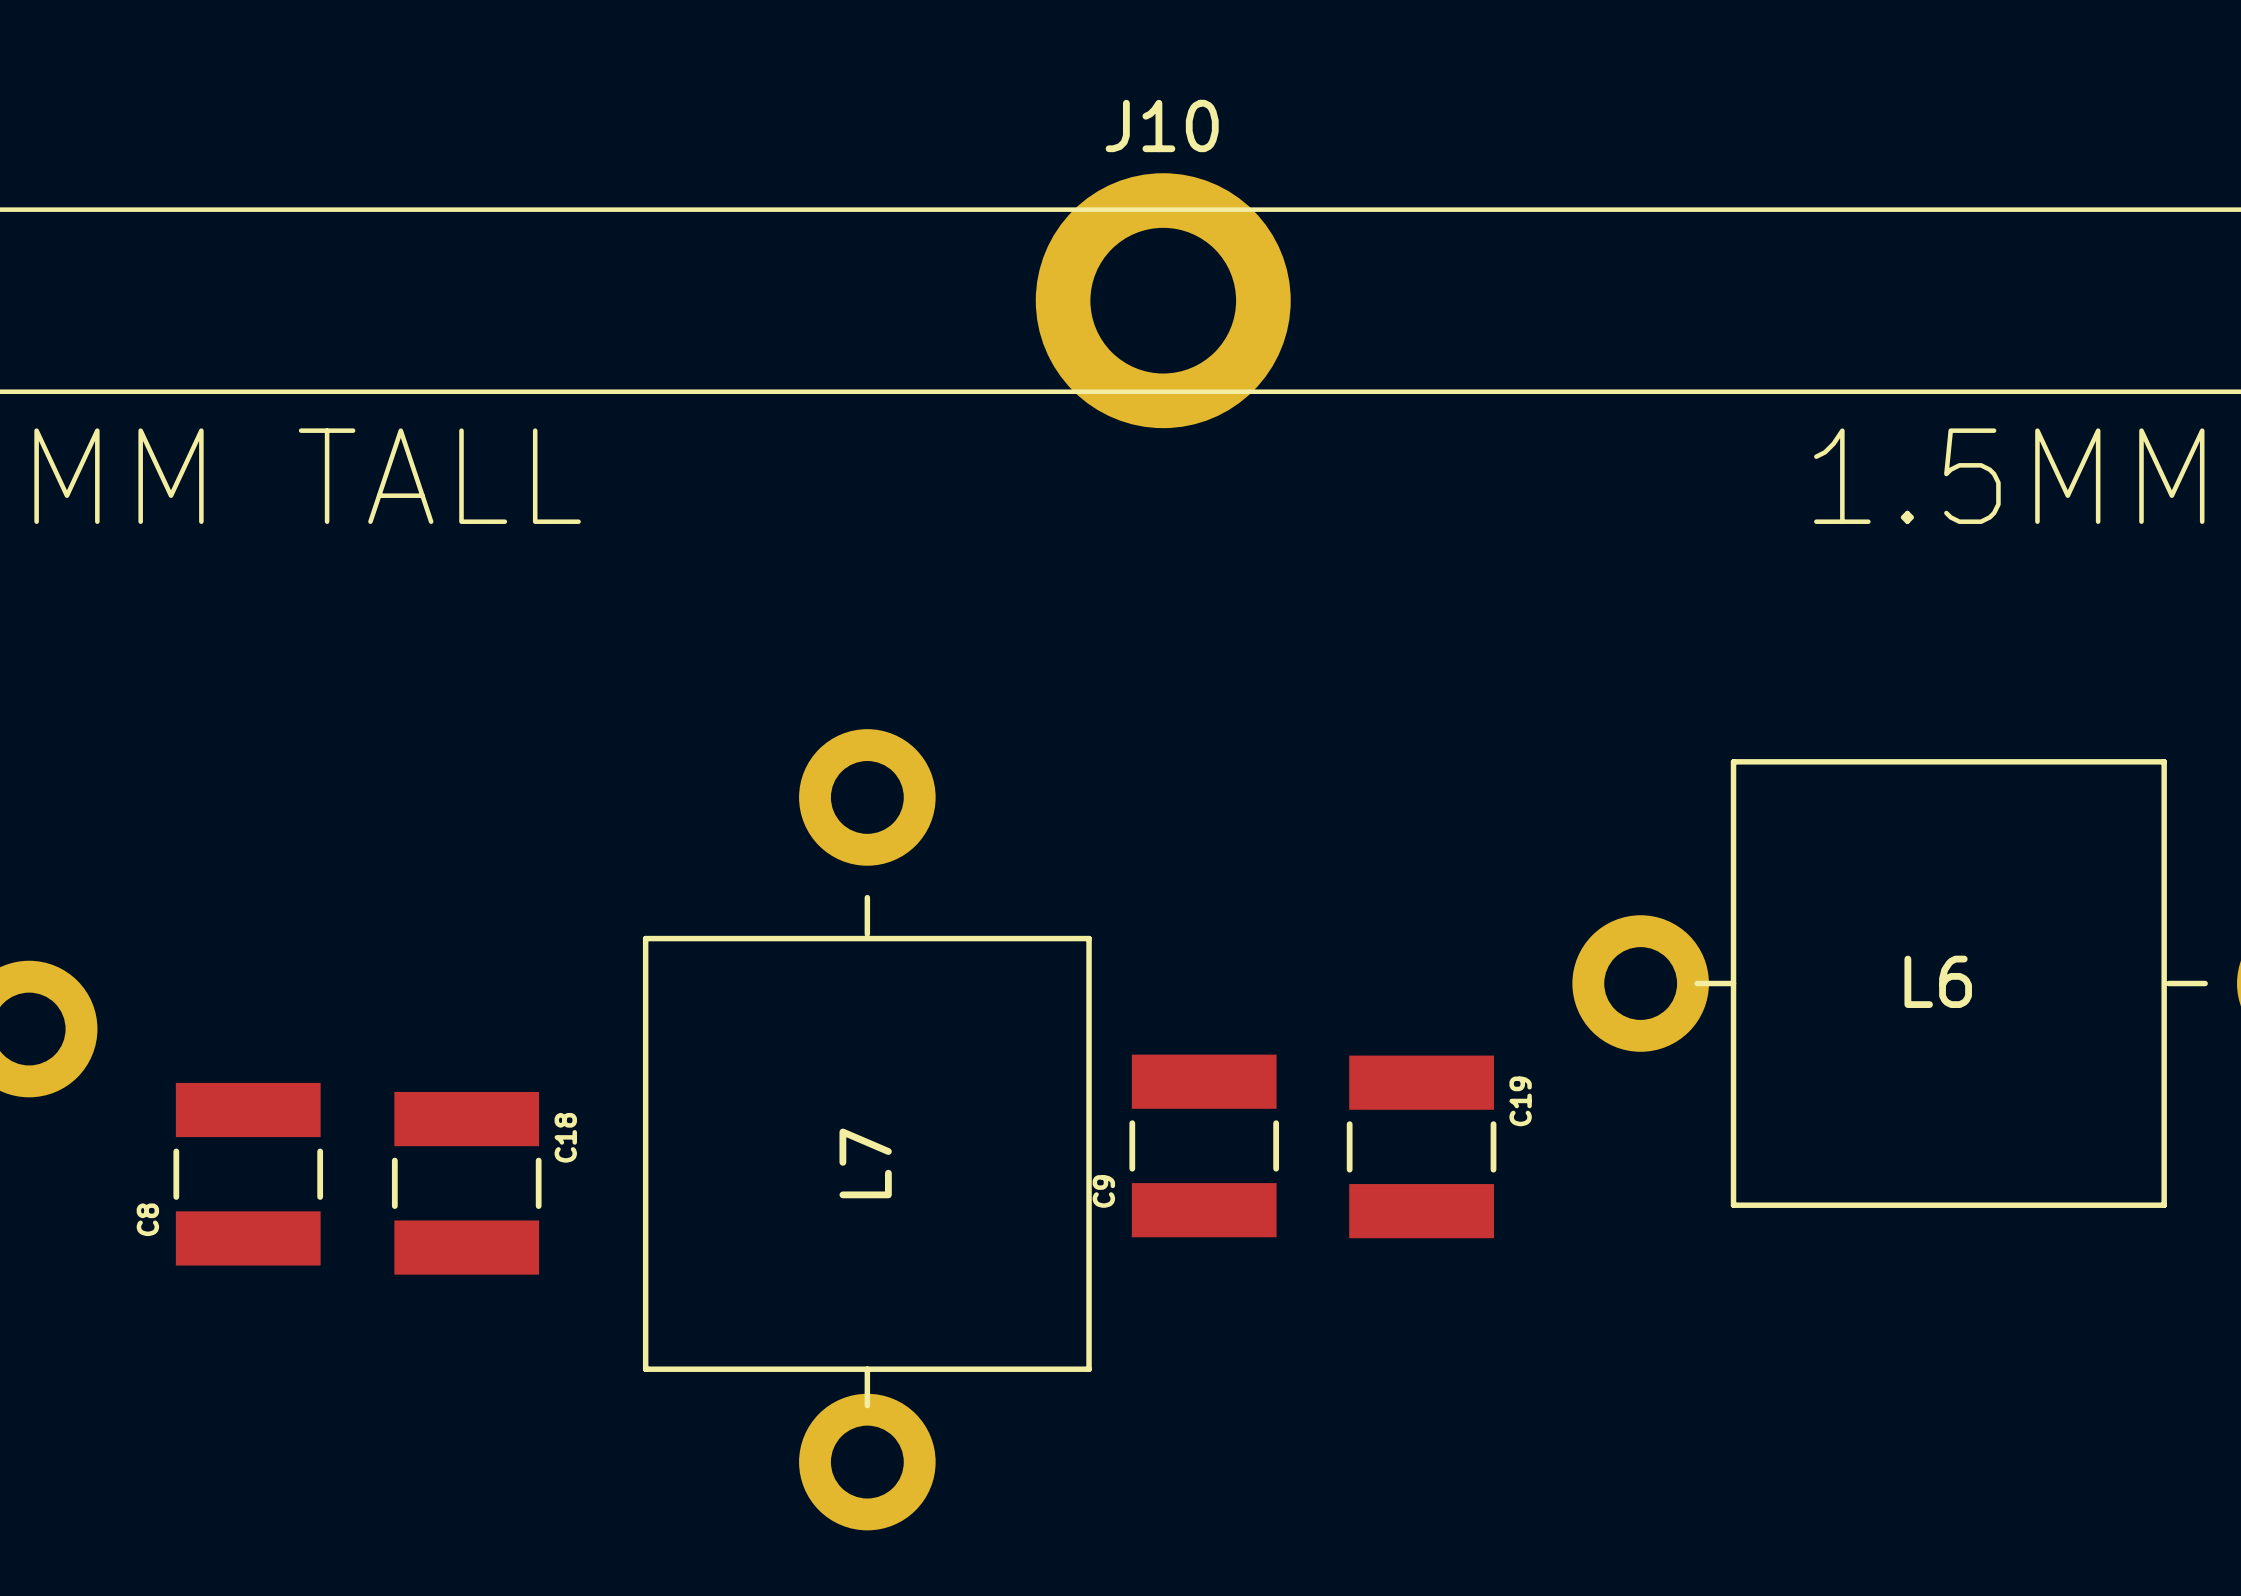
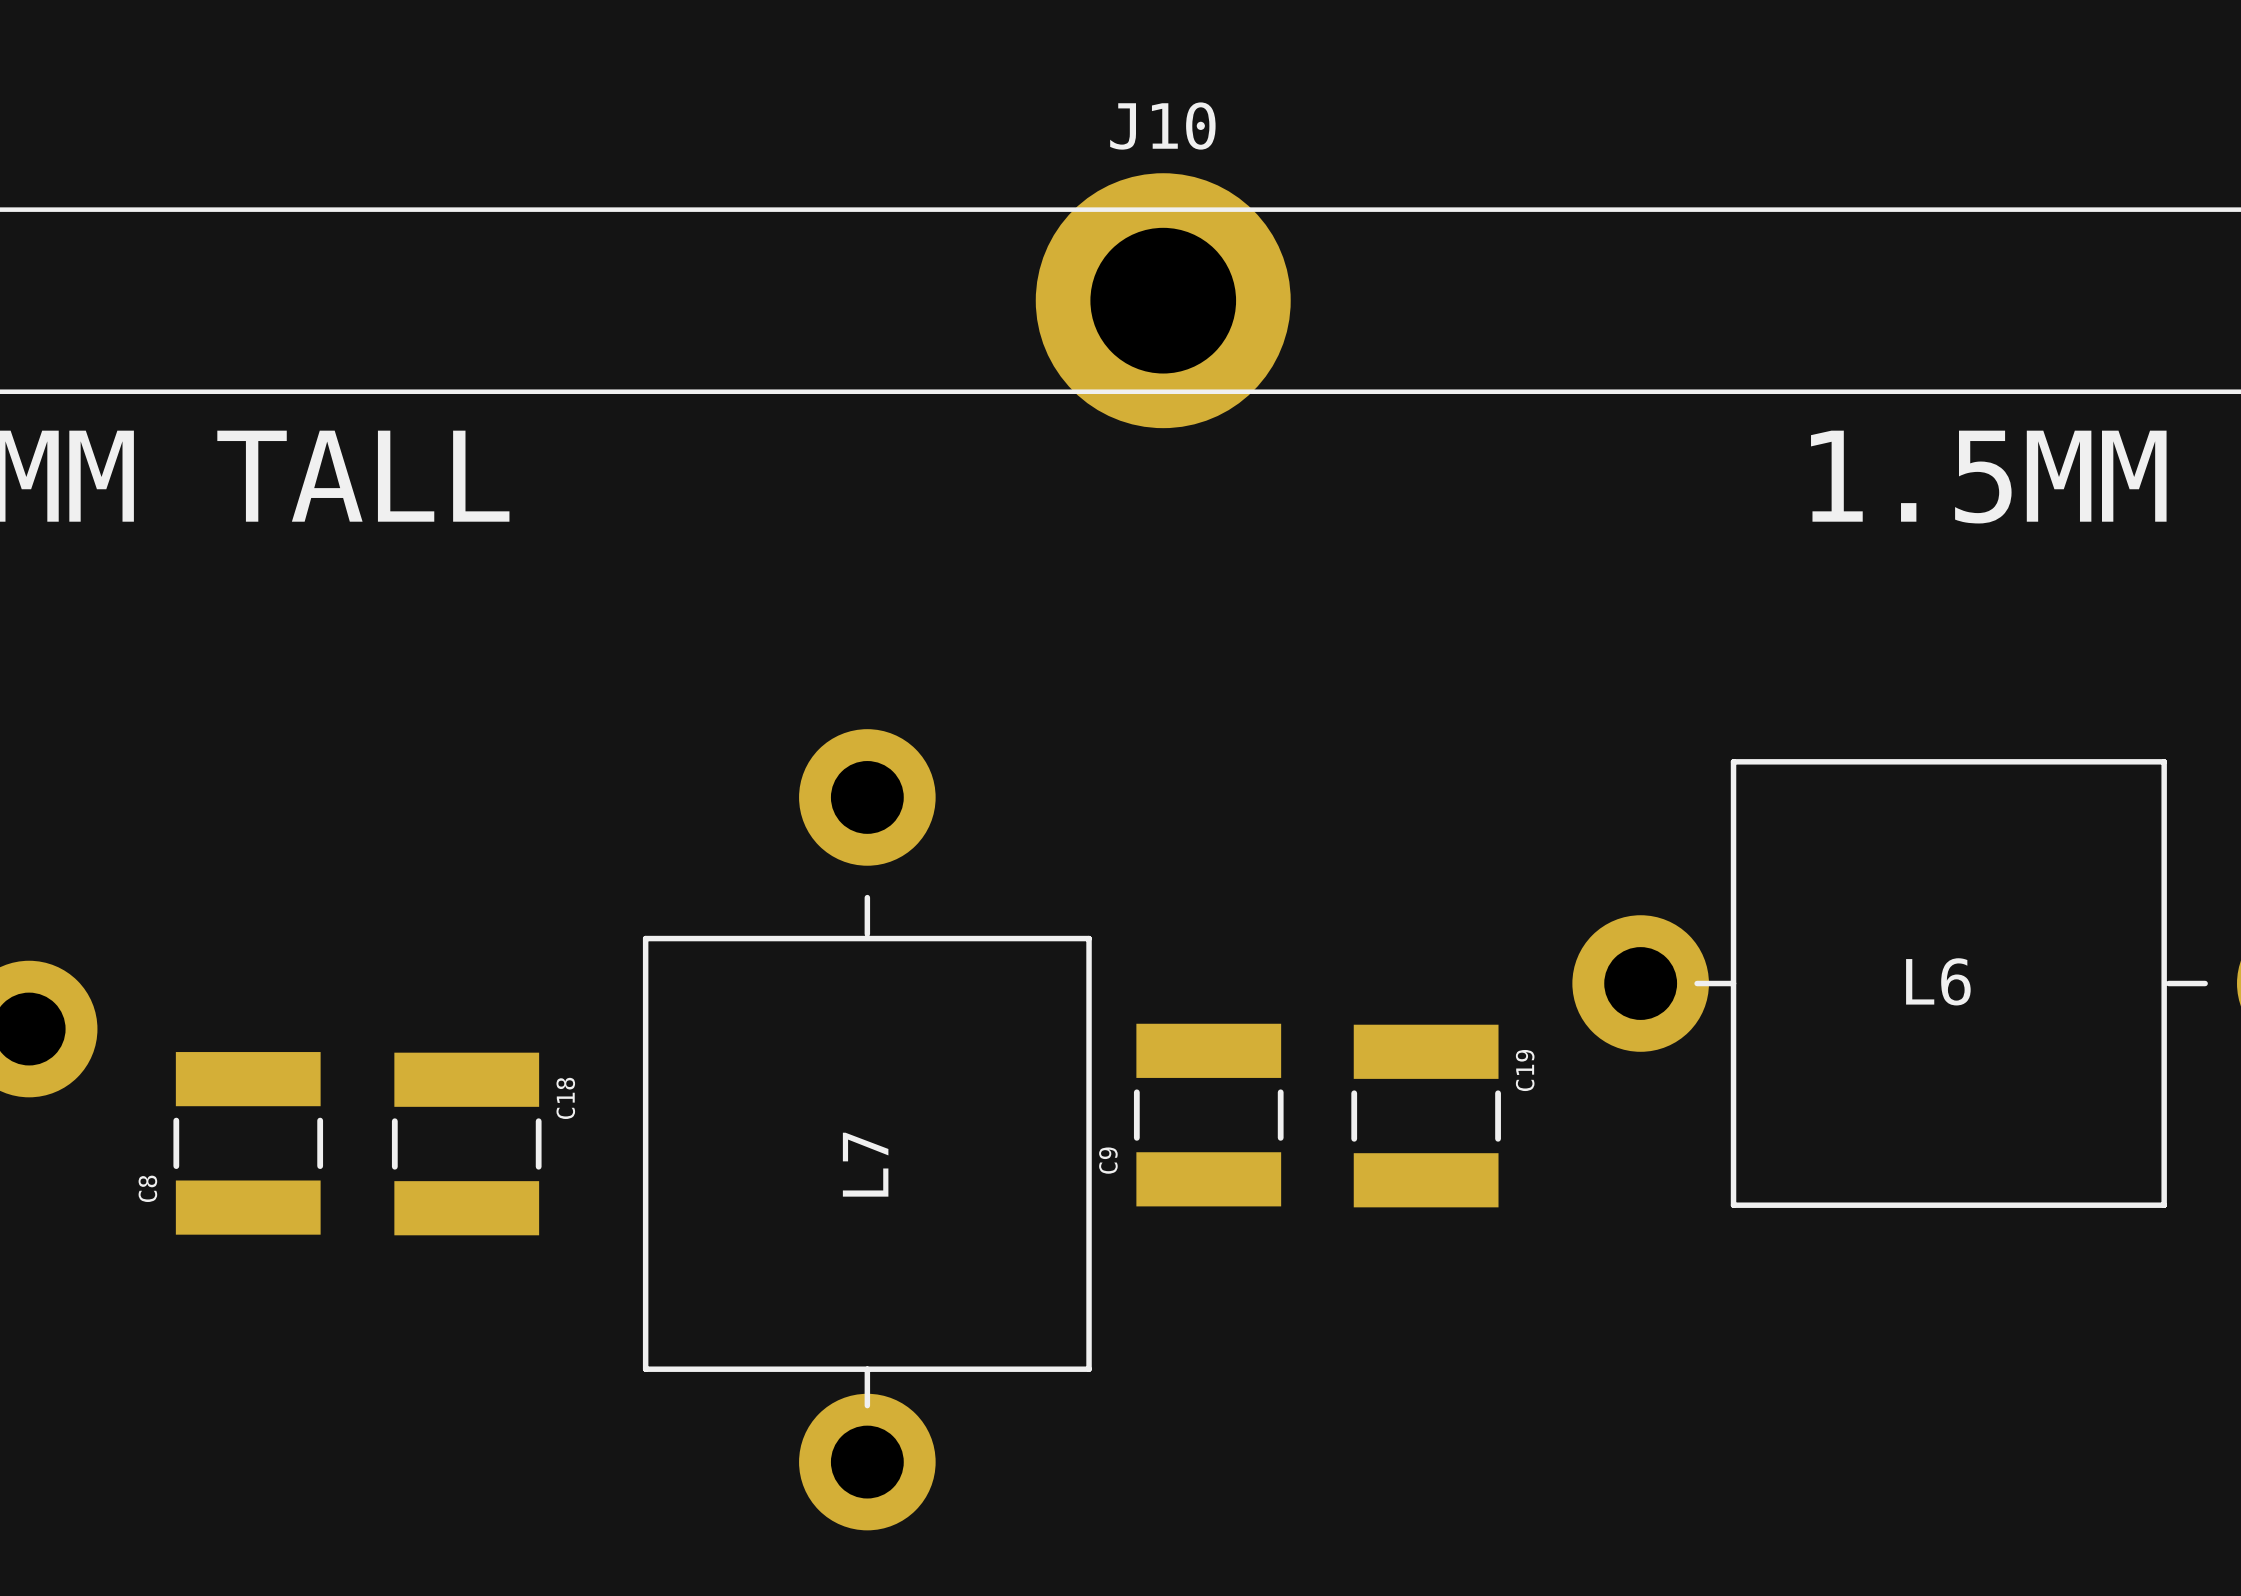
C9 position: (1204, 1145) -> (1208, 1115)
C19 position: (1421, 1146) -> (1426, 1116)
C8 position: (248, 1174) -> (248, 1143)
C18 position: (466, 1183) -> (466, 1143)

